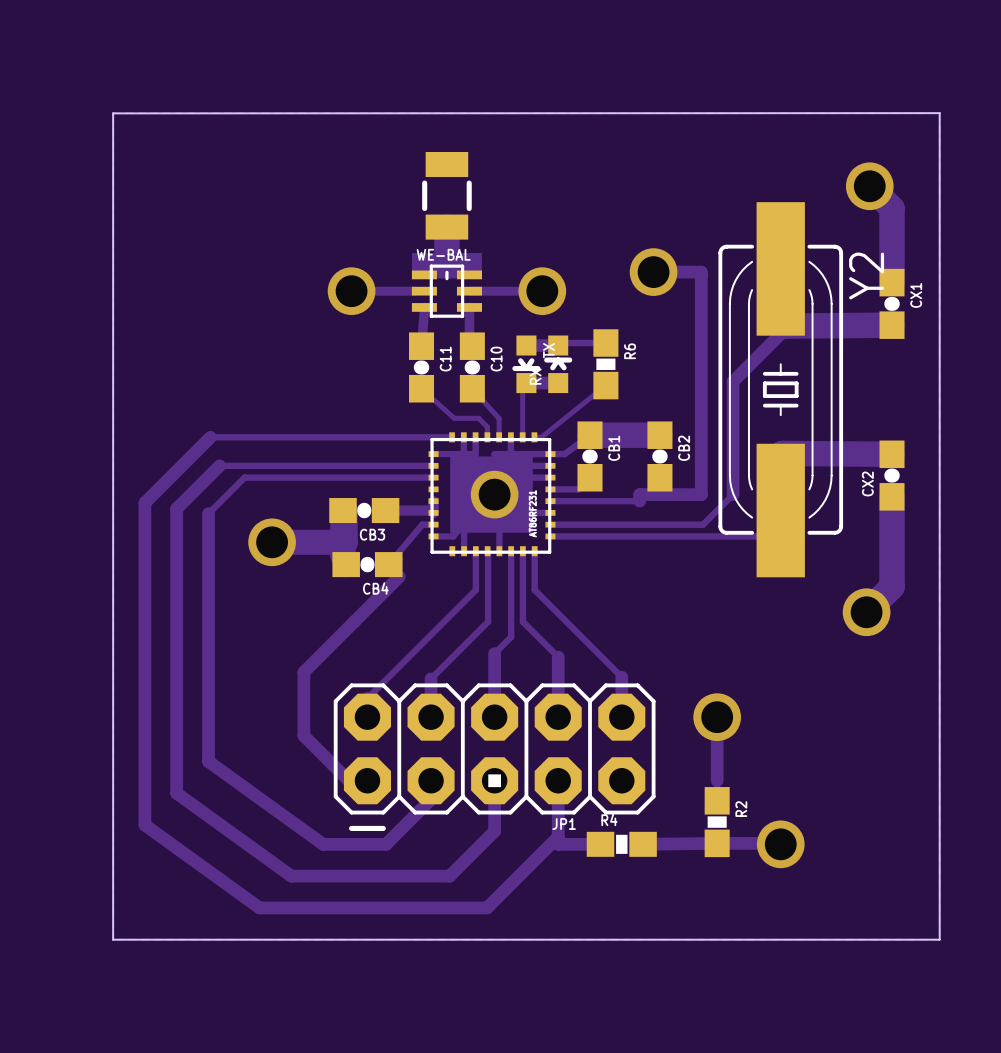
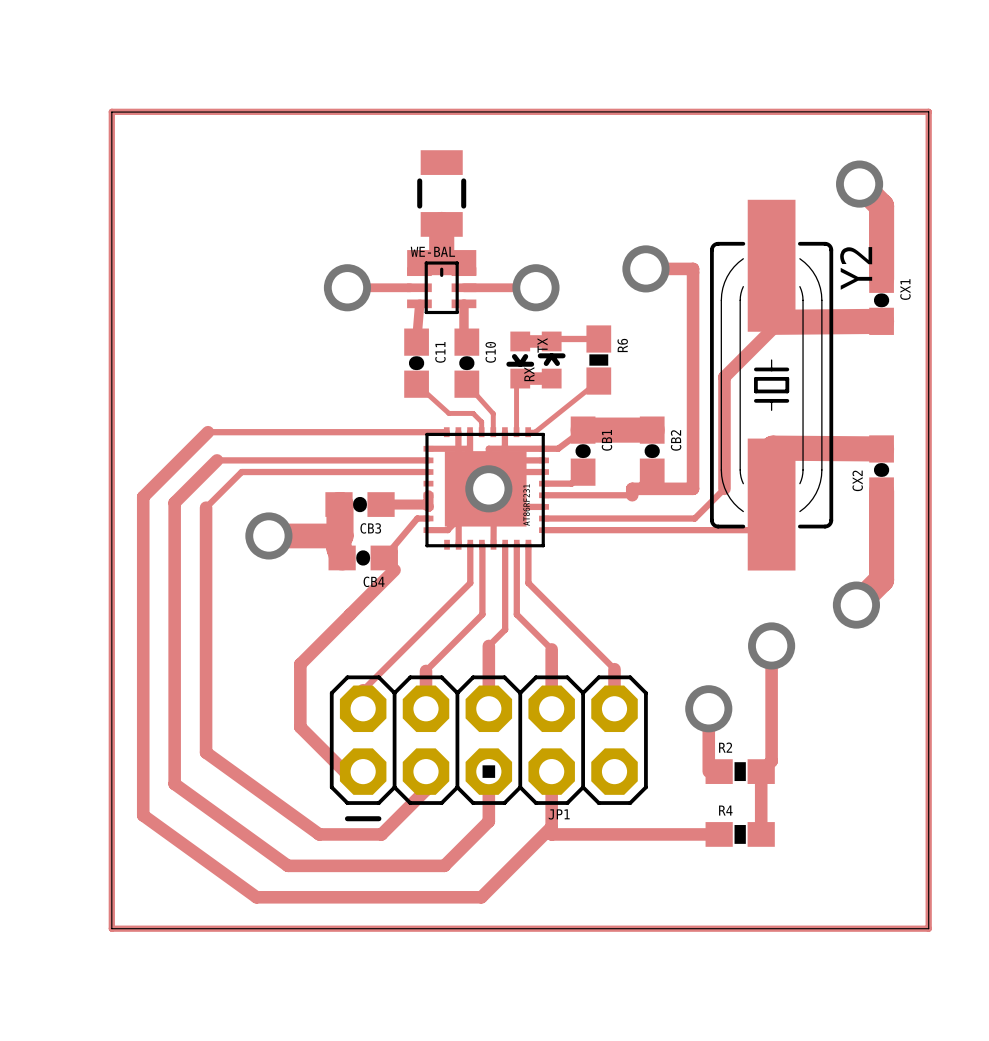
track: none -> (111, 111) (928, 111) (928, 928) (111, 928) (111, 111)
track: none -> (771, 645) (771, 761) (761, 771) (761, 834)
via: none -> (771, 645)
R2 rotation: 0° (717, 822) -> 90° clockwise (740, 771)
R2 position: (717, 822) -> (740, 771)
track: none -> (593, 834) (719, 834)
R4 position: (621, 844) -> (740, 834)
track: (643, 844) (780, 844) -> none
via: (780, 844) -> none

